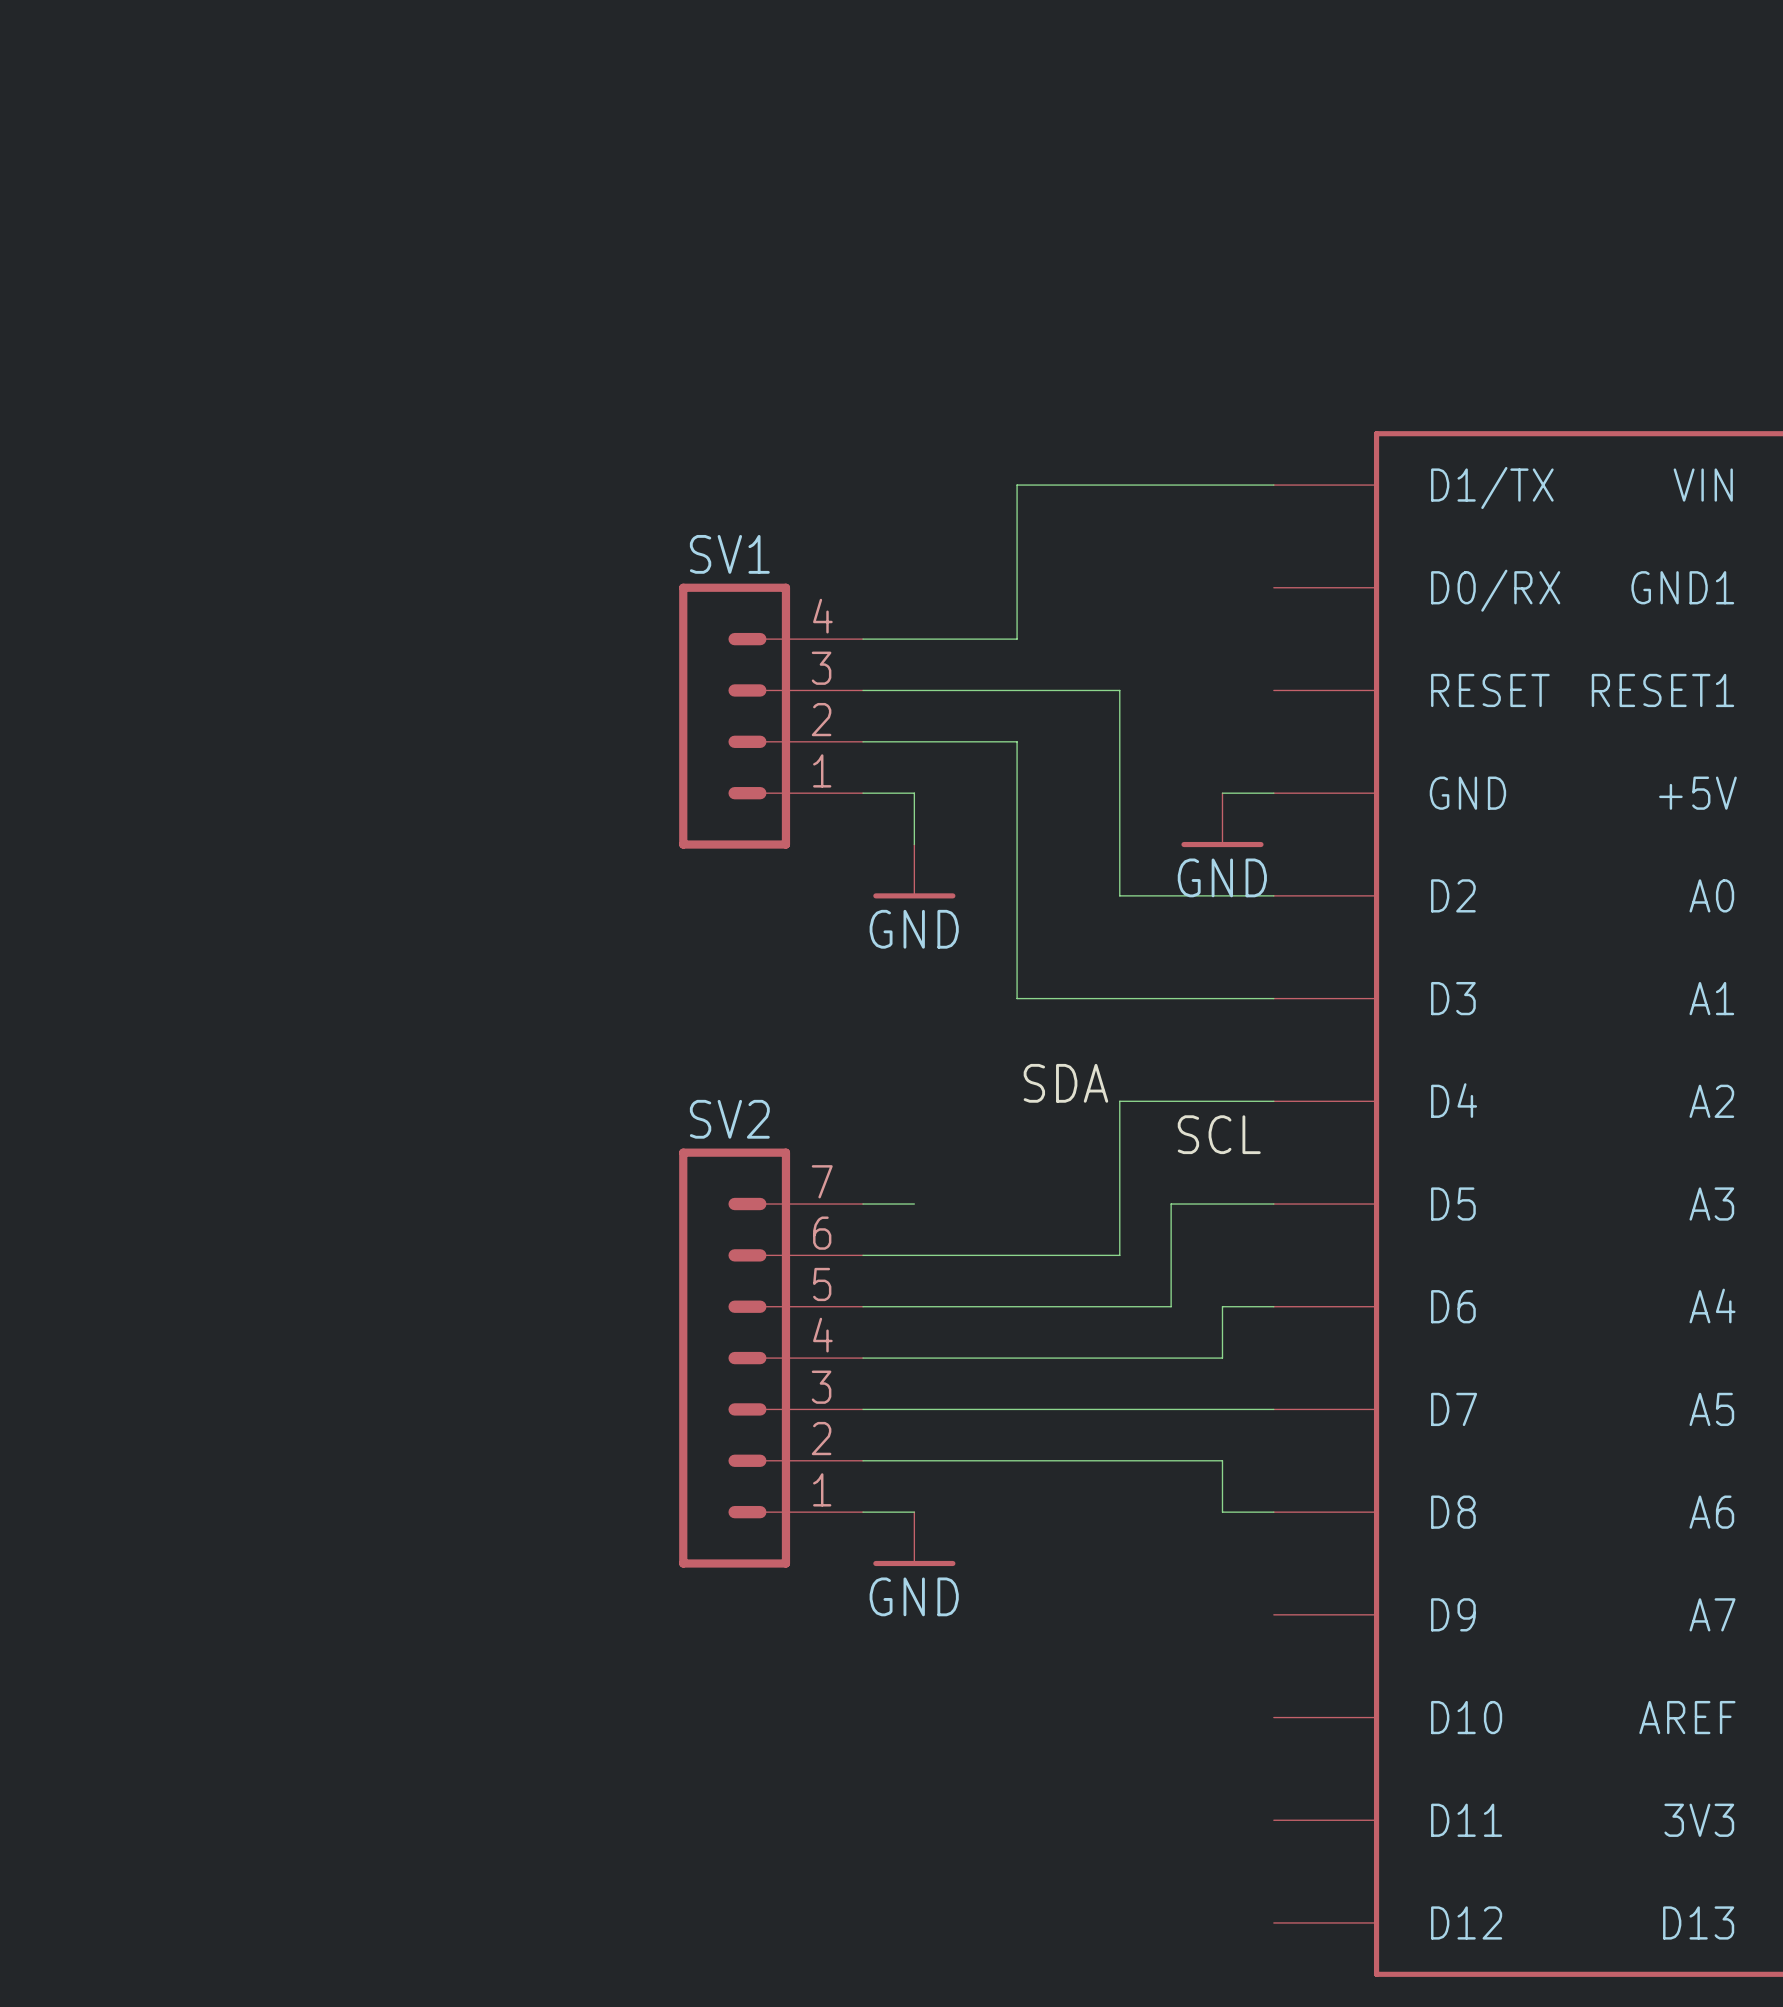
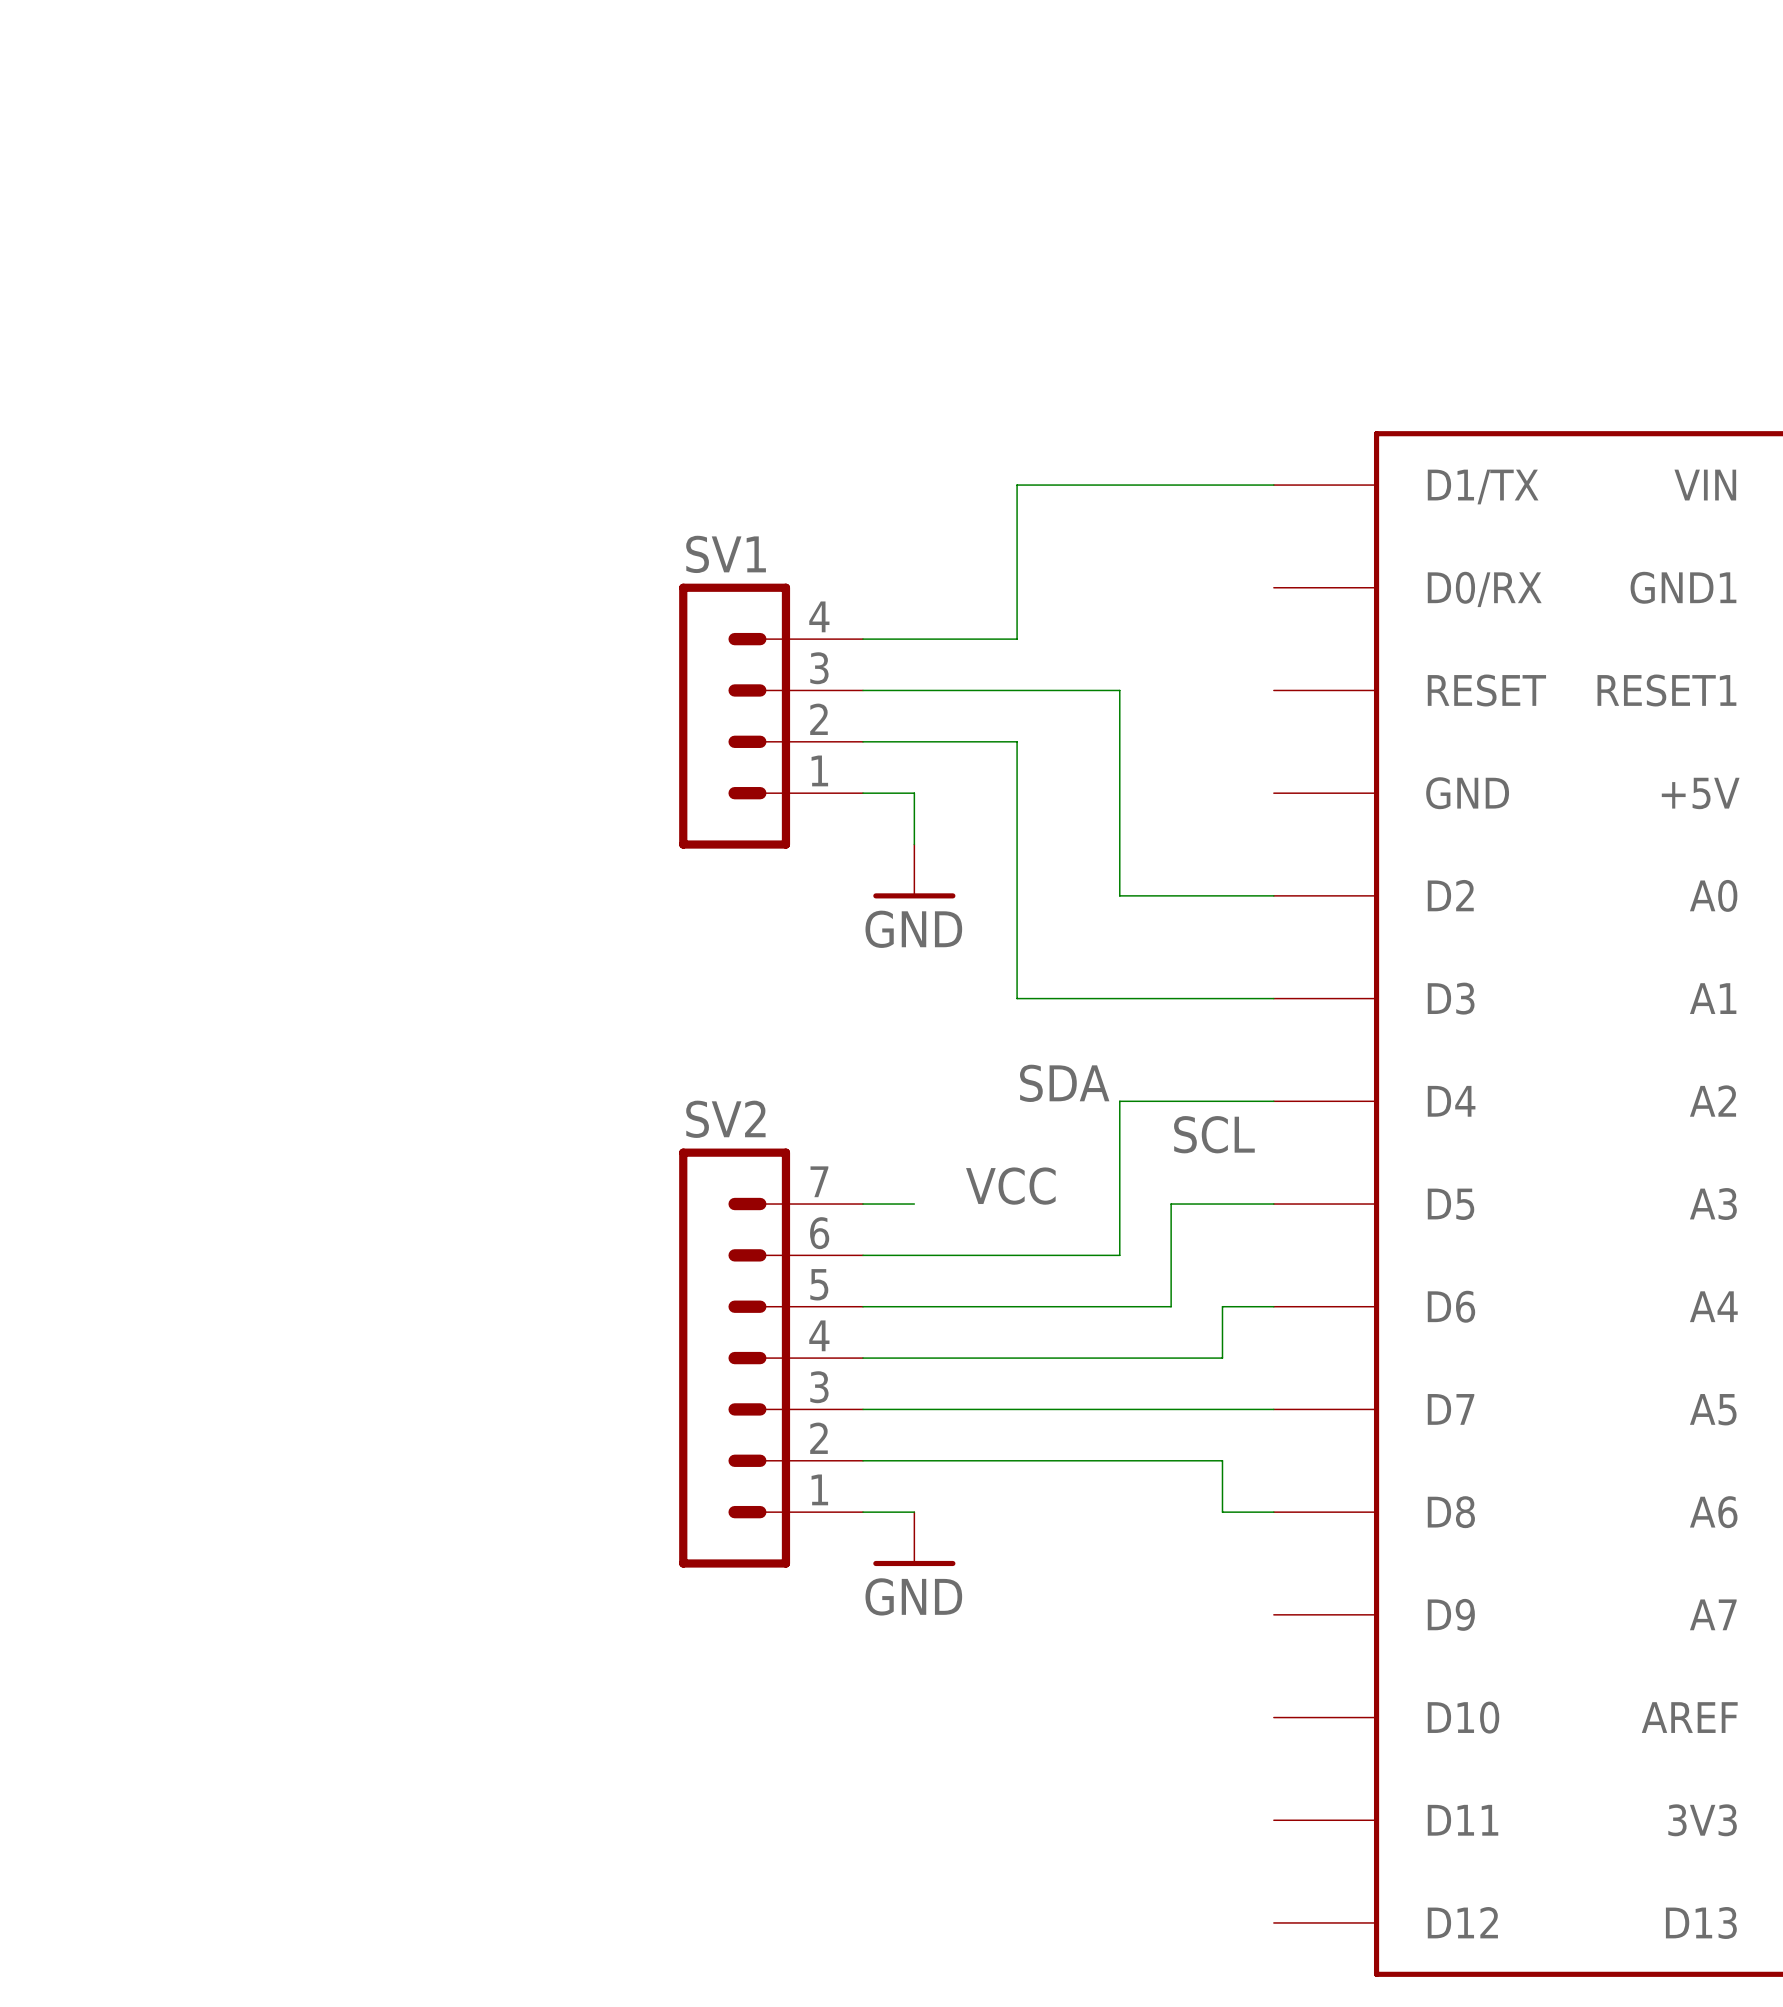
wire: (1222, 793) (1273, 793) -> none
power symbol: GND (1222, 820) -> none
label: none -> VCC (1010, 1186)

